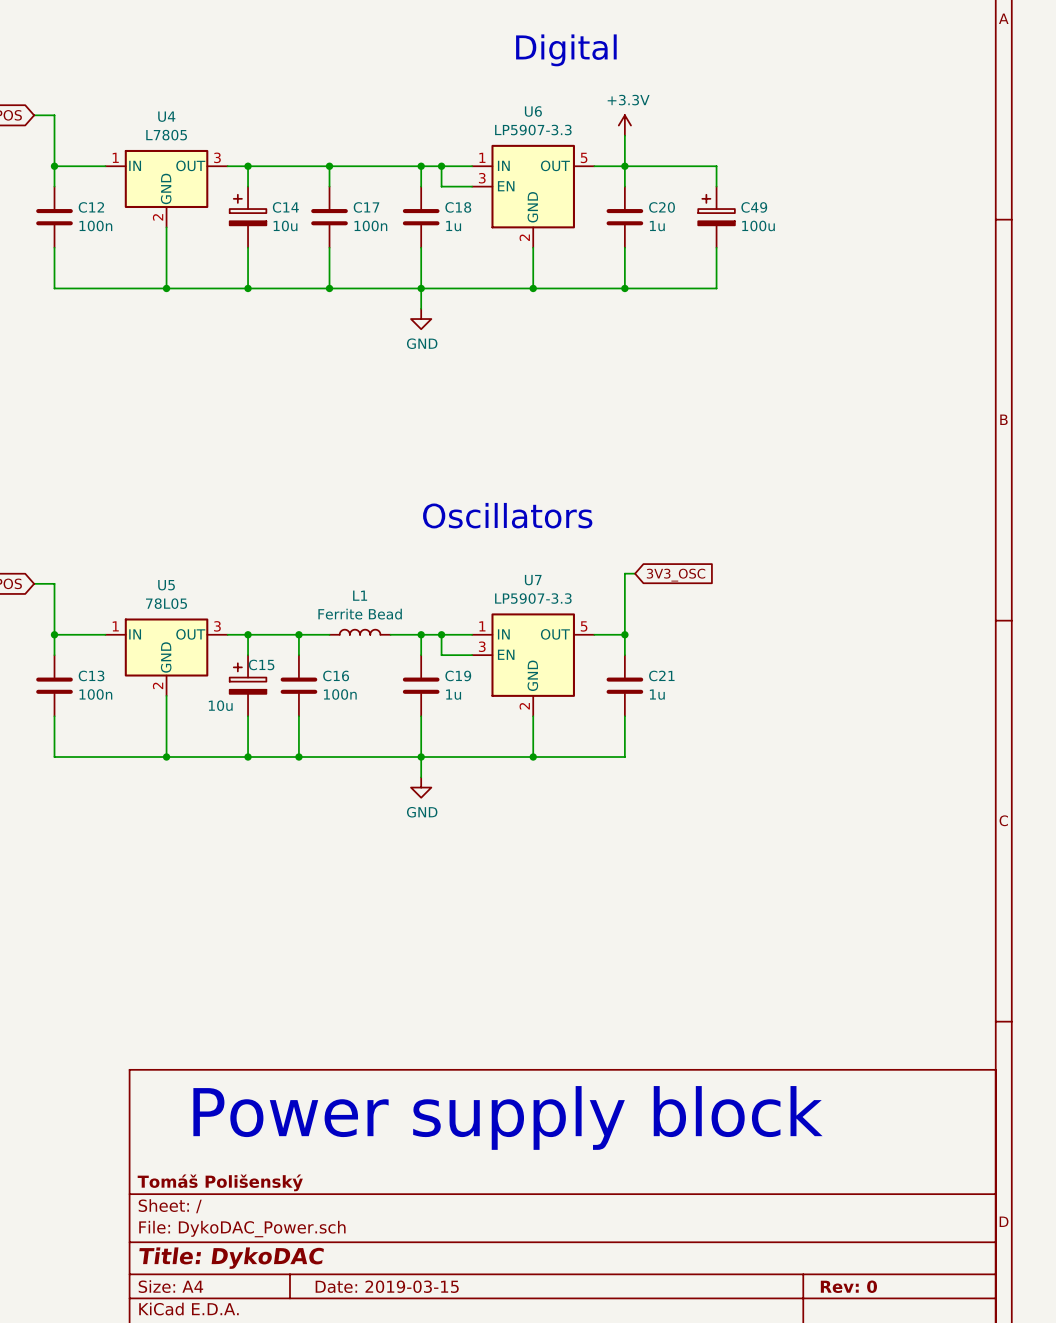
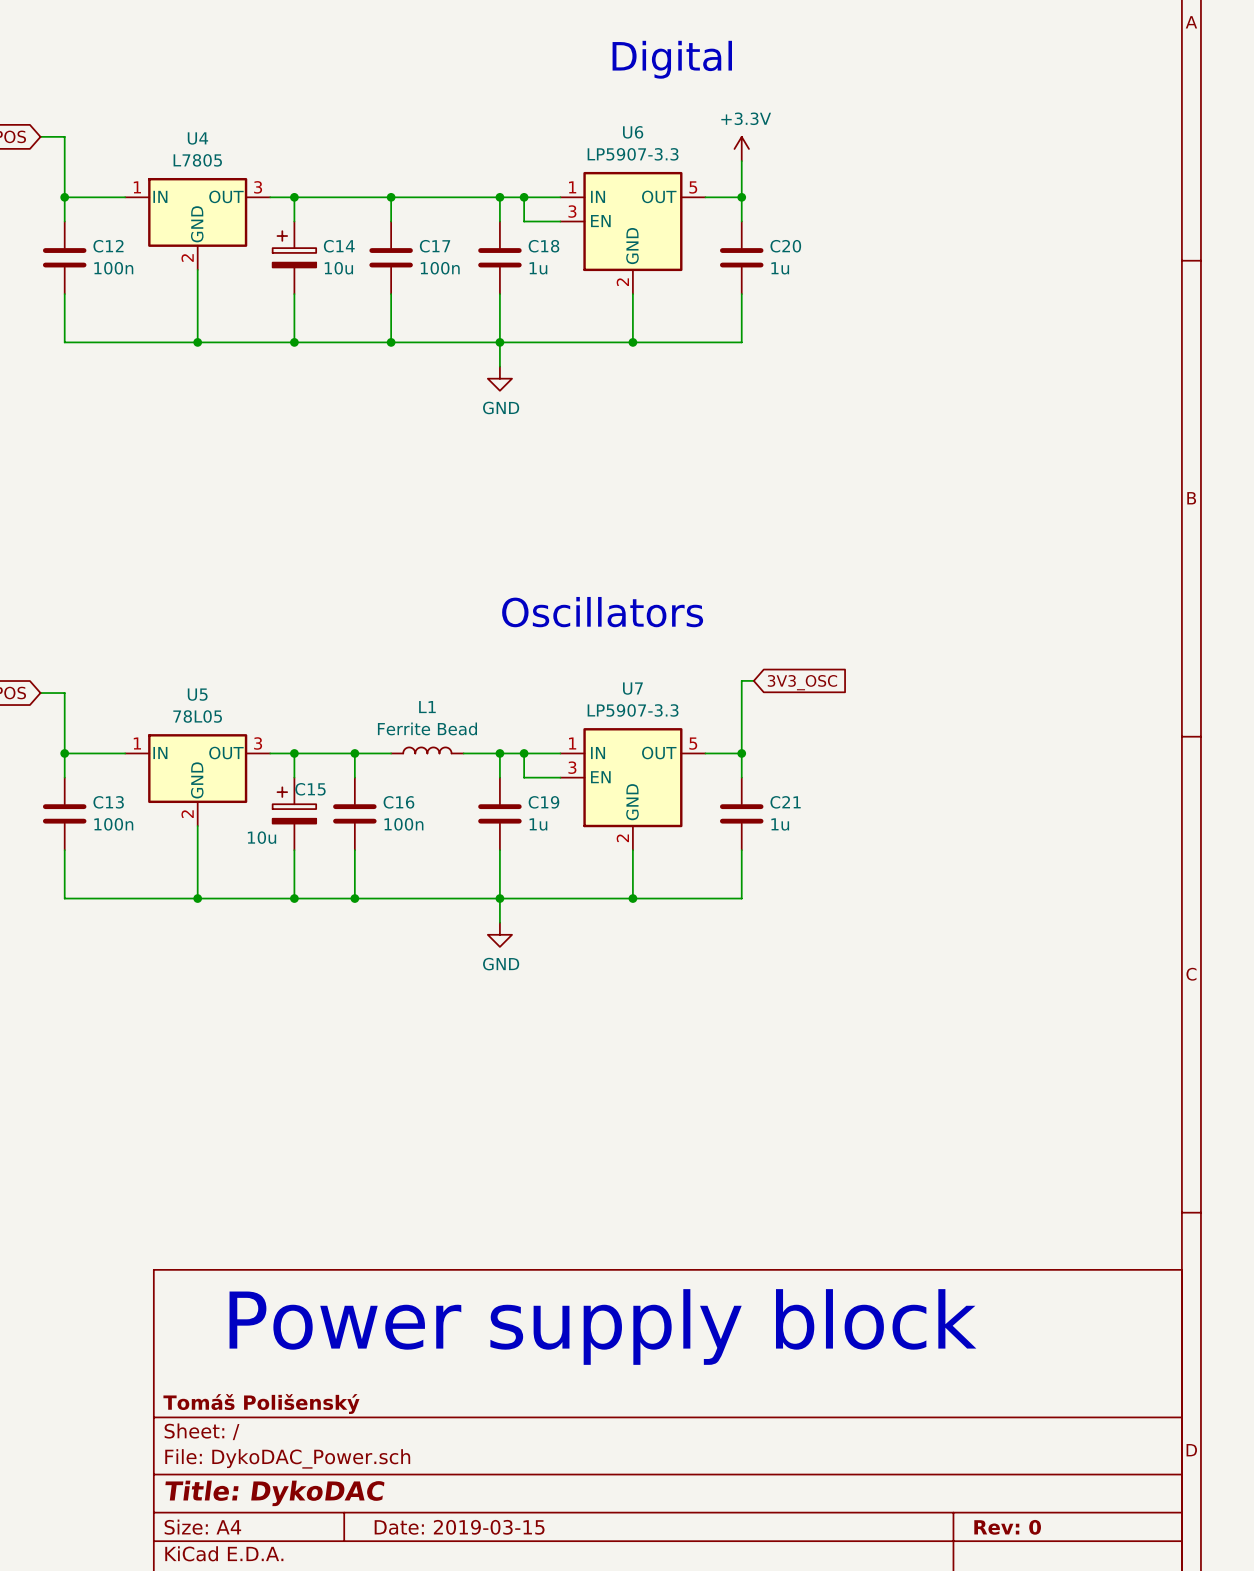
wire: (624, 166) (716, 166) (716, 186) -> none
C49: 100u (716, 217) -> none
wire: (716, 247) (716, 288) (624, 288) -> none
junction: (624, 288) -> none

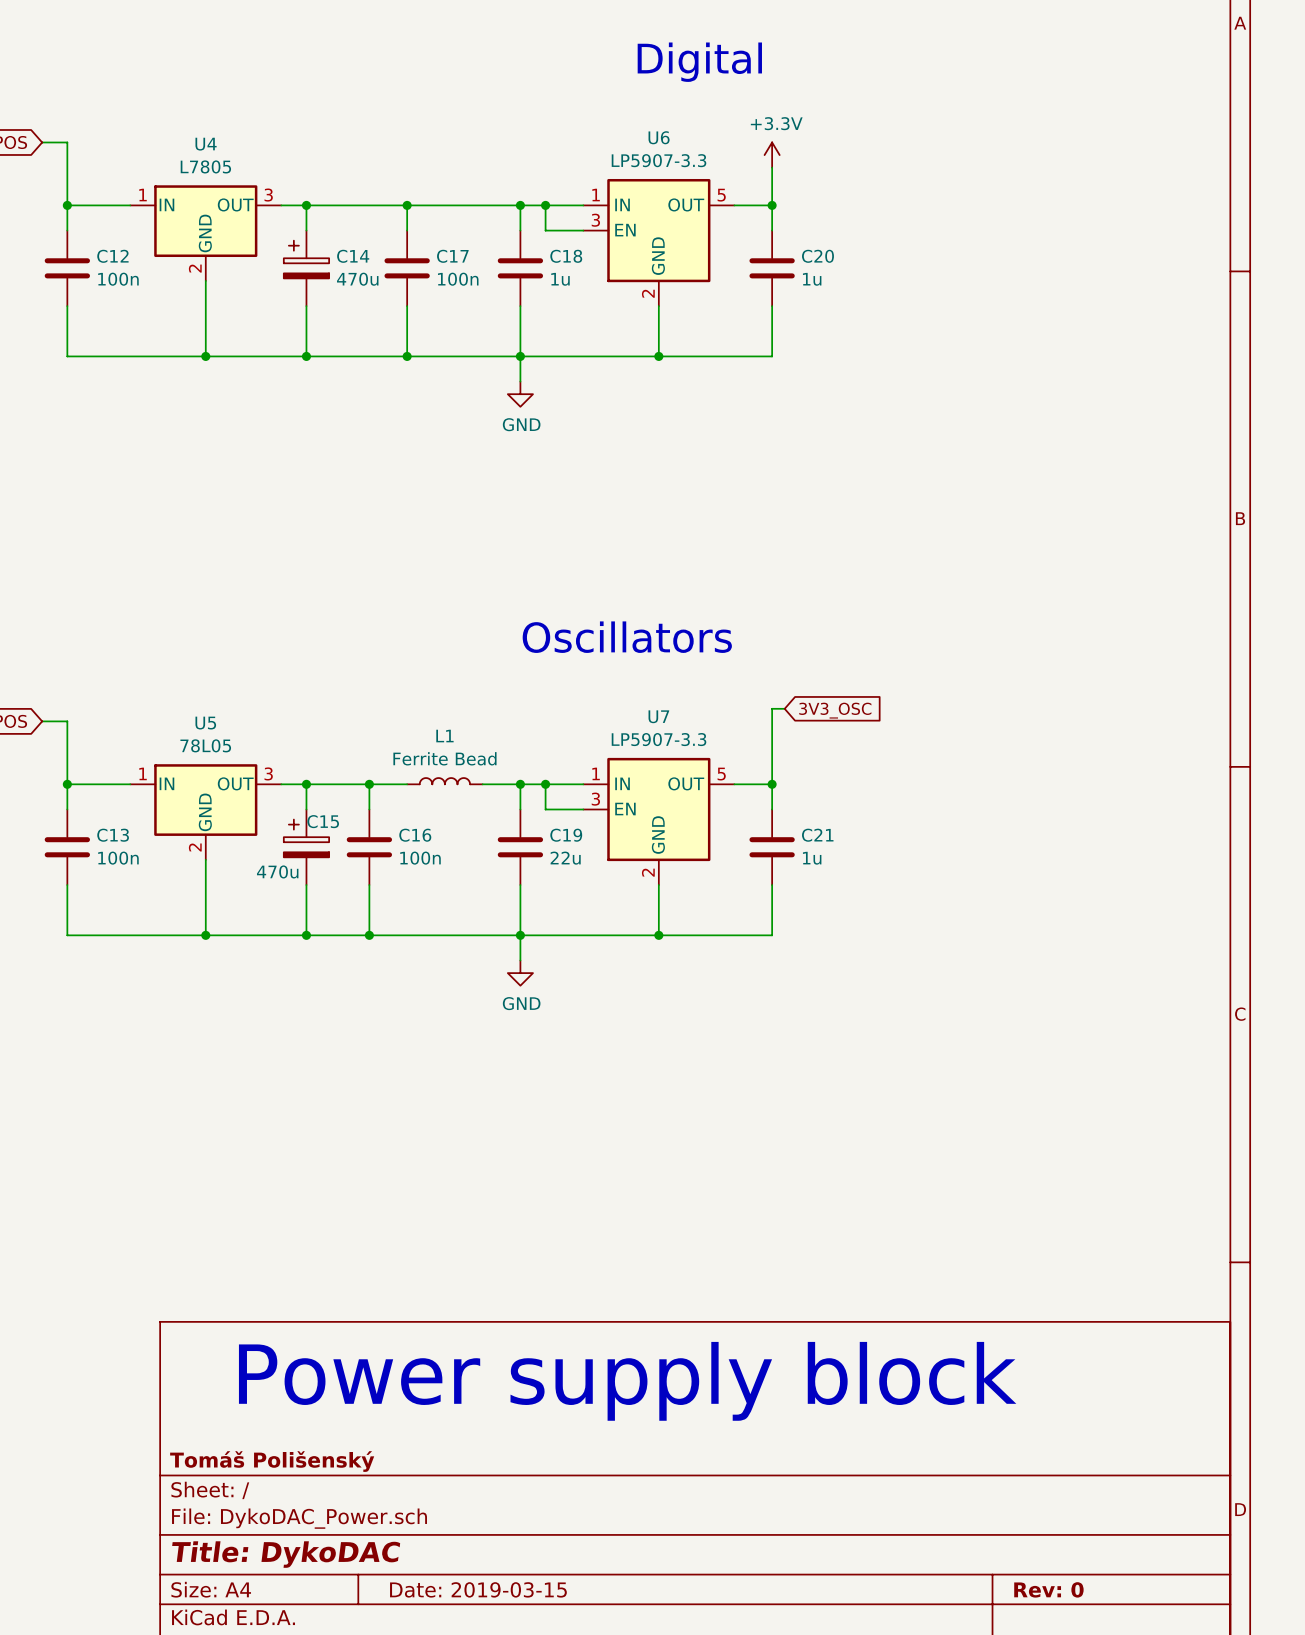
C14 value: 10u (338, 268) -> 470u (357, 279)
C19 value: 1u (538, 824) -> 22u (565, 858)
C15 value: 10u (262, 837) -> 470u (277, 871)

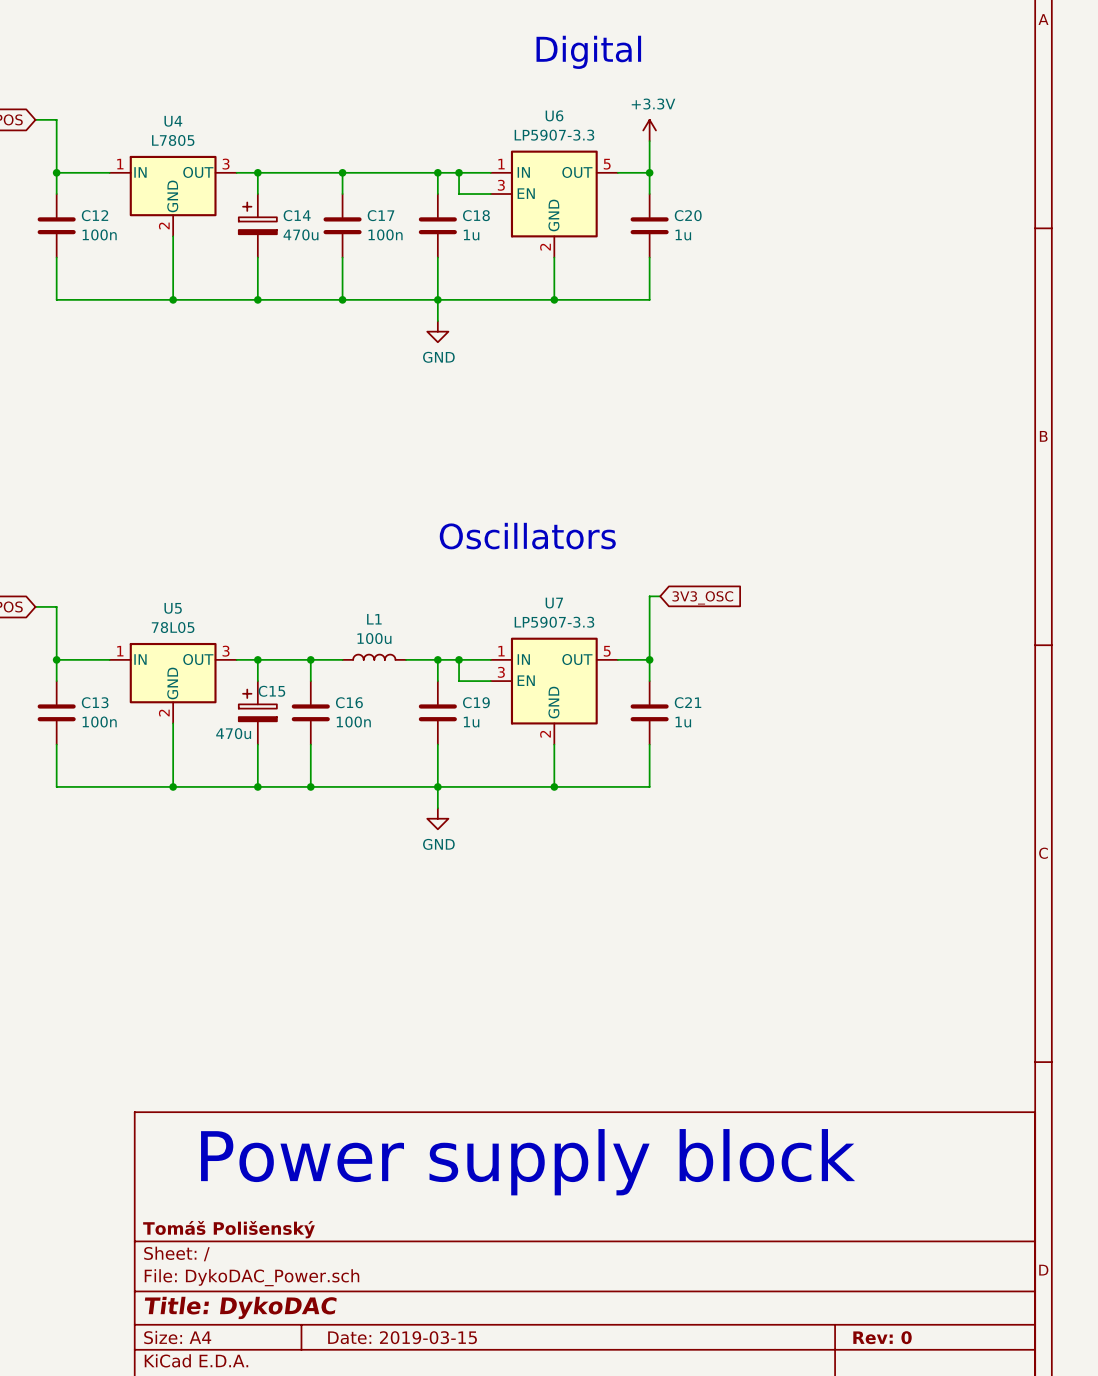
L1 value: Ferrite Bead (444, 758) -> 100u (374, 638)
C19 value: 22u (565, 858) -> 1u (471, 722)

